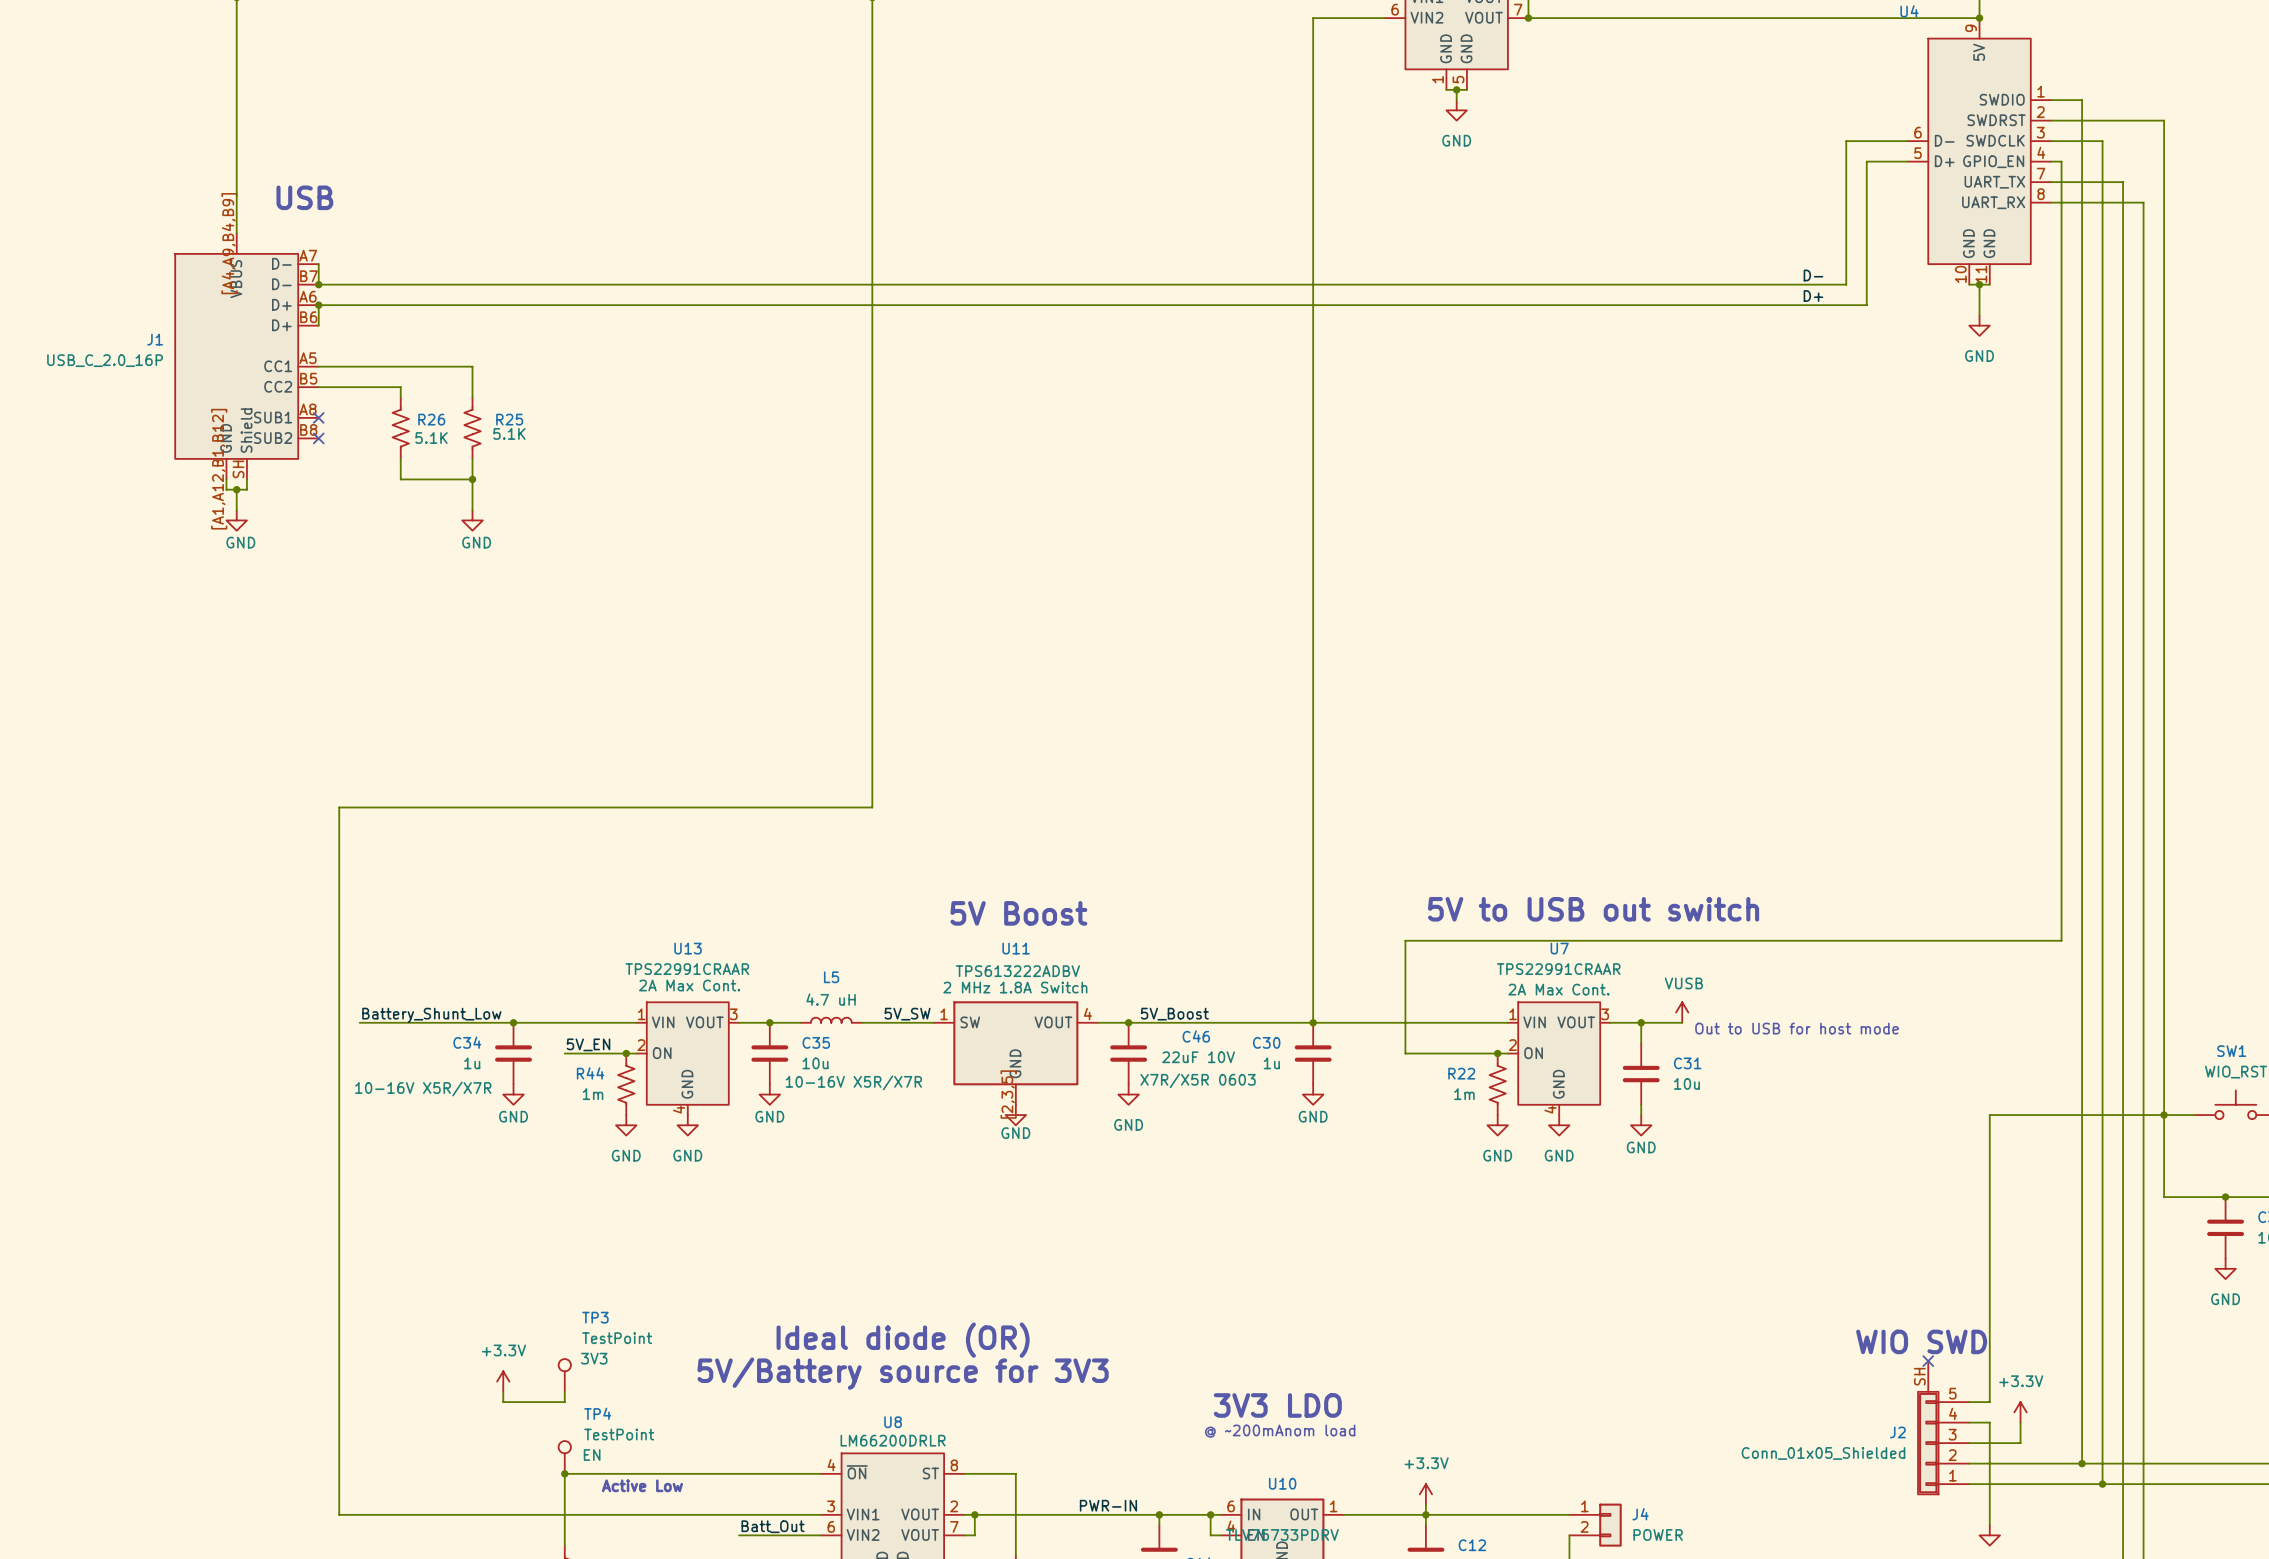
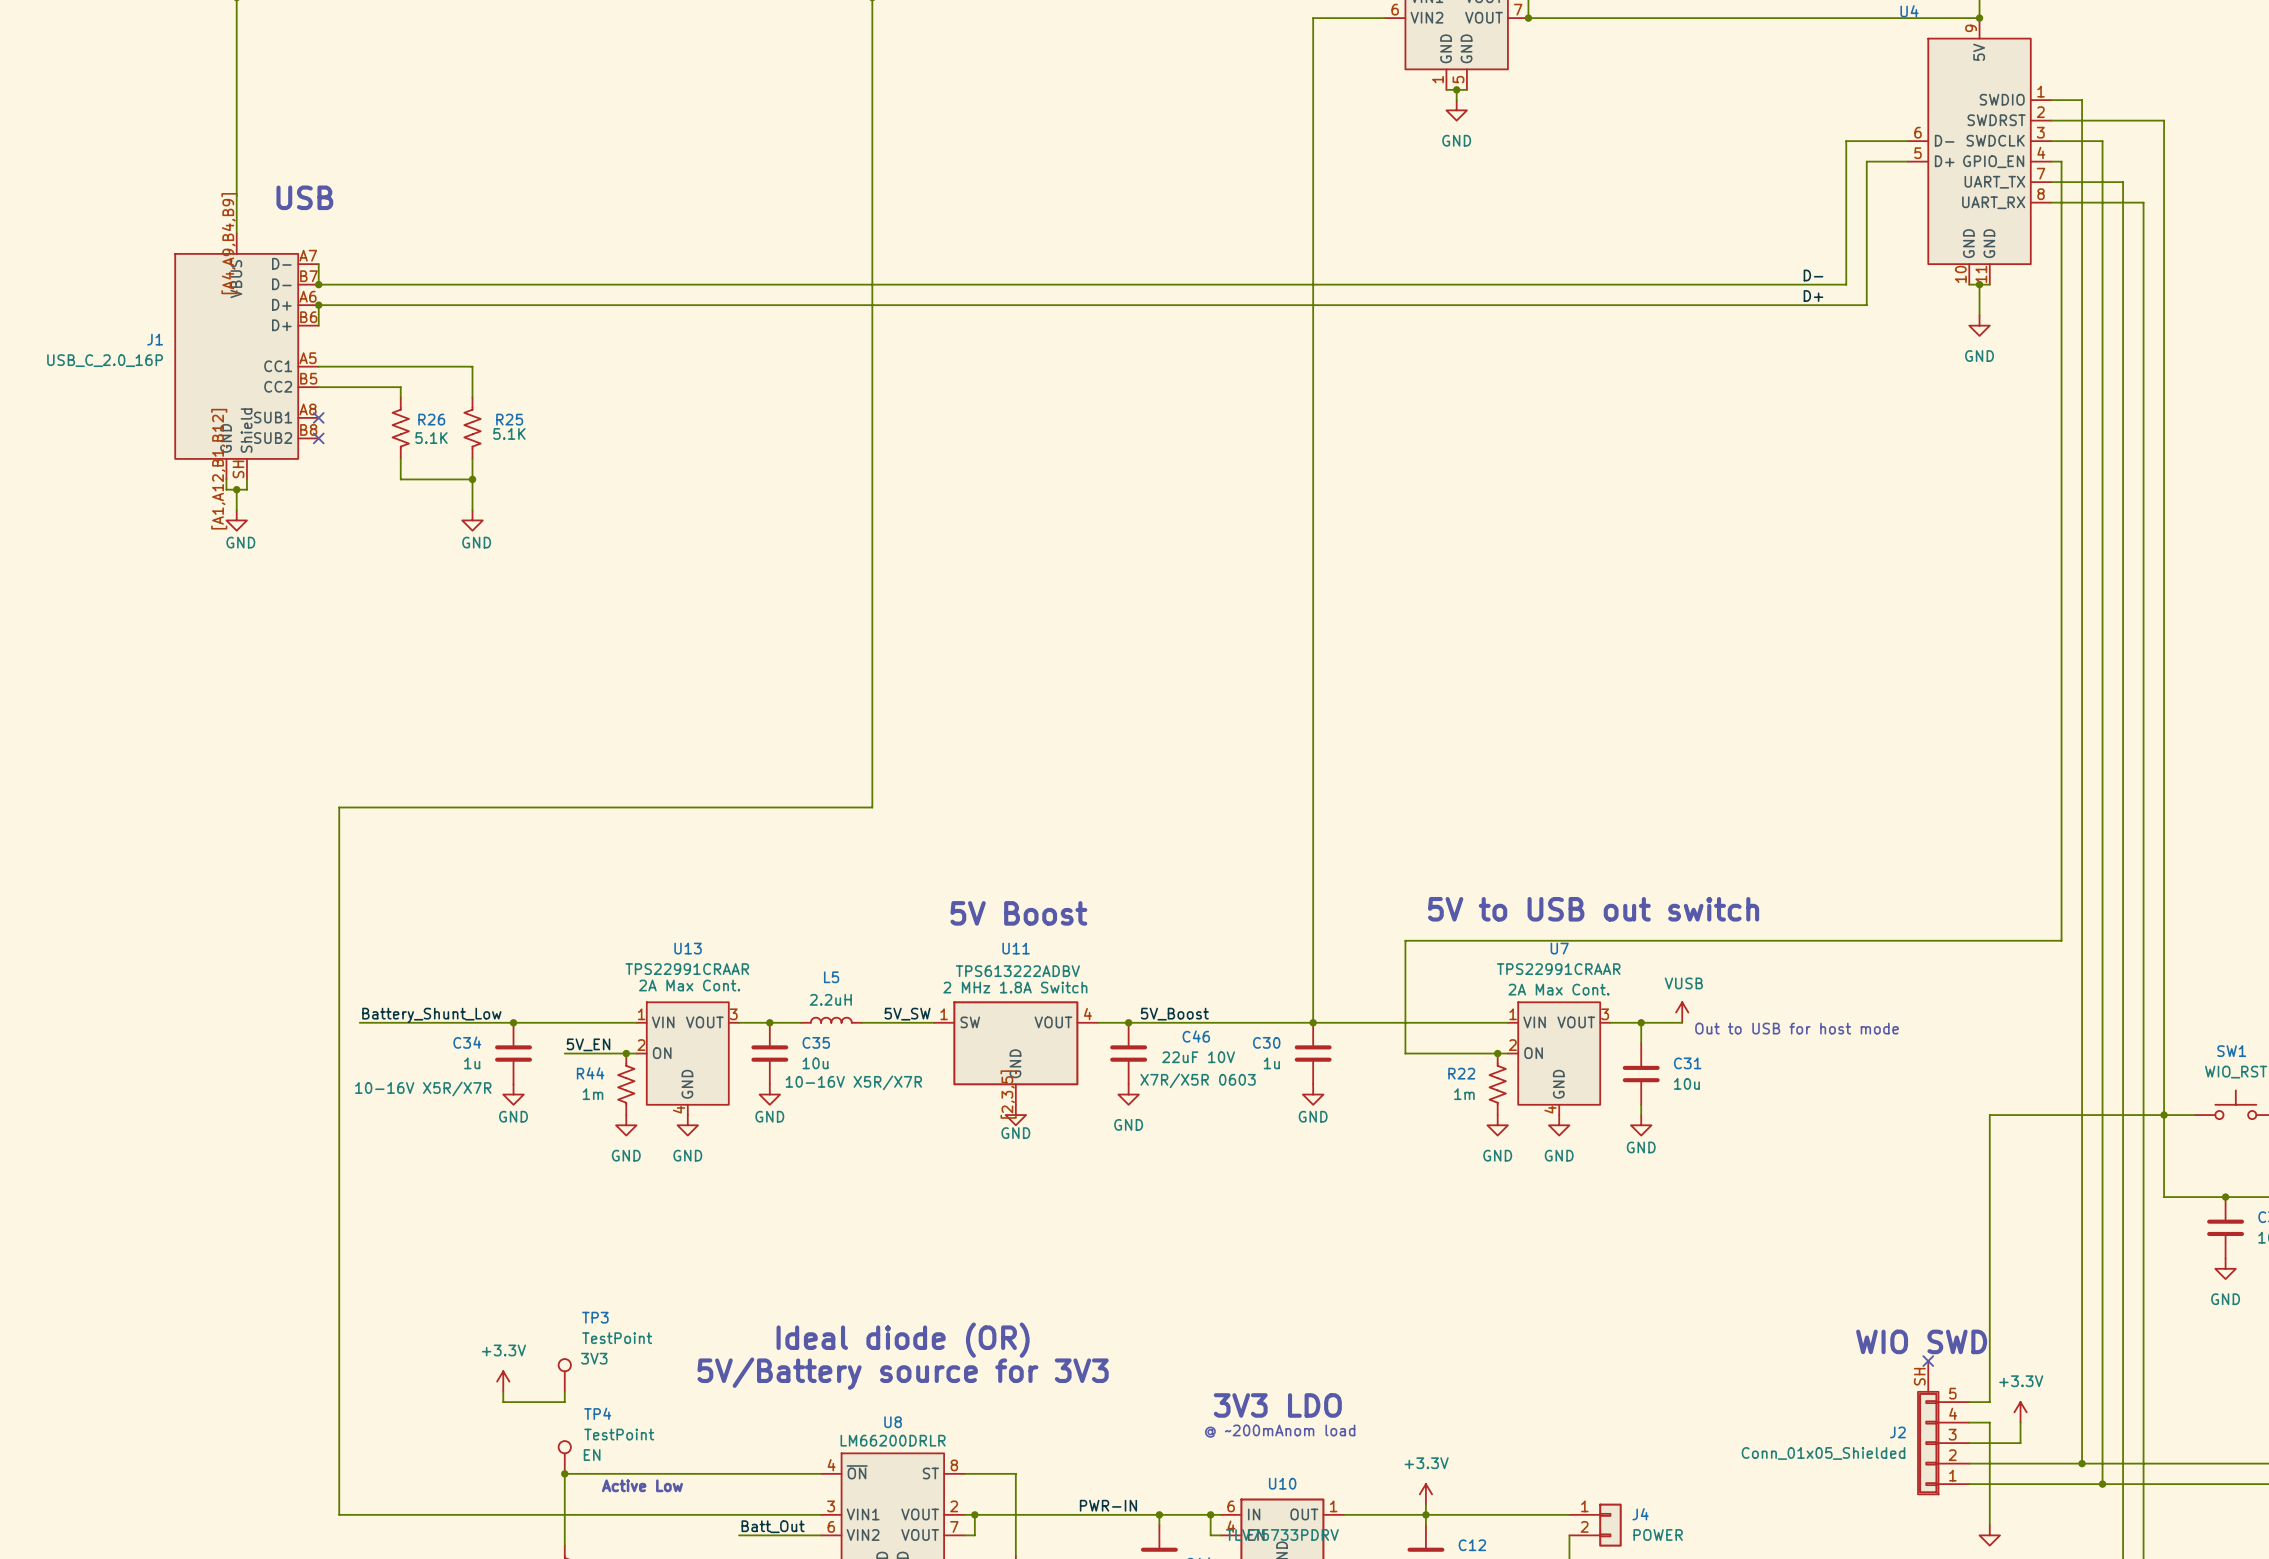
L5 value: 4.7 uH (831, 999) -> 2.2uH (830, 999)

